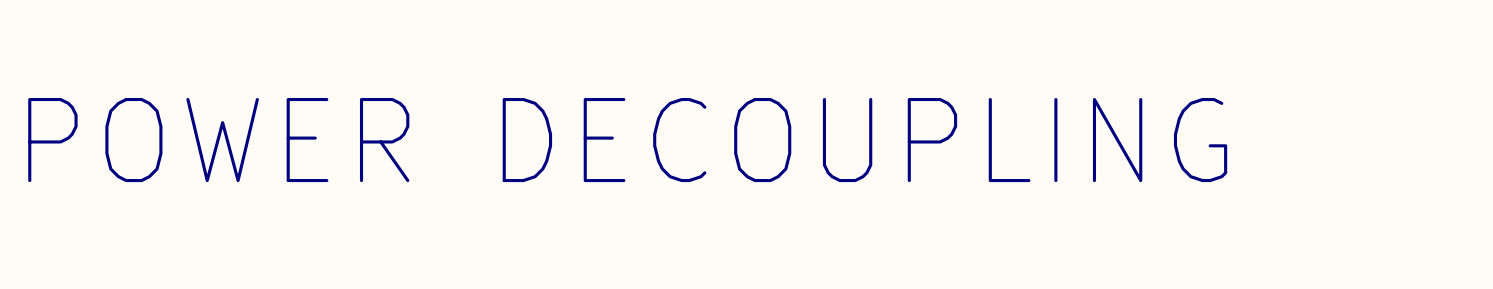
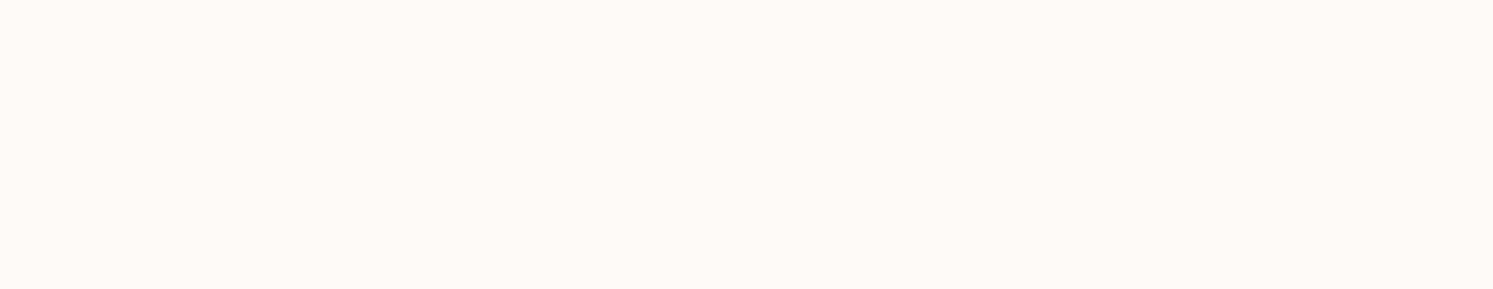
text: POWER DECOUPLING (627, 140) -> none

